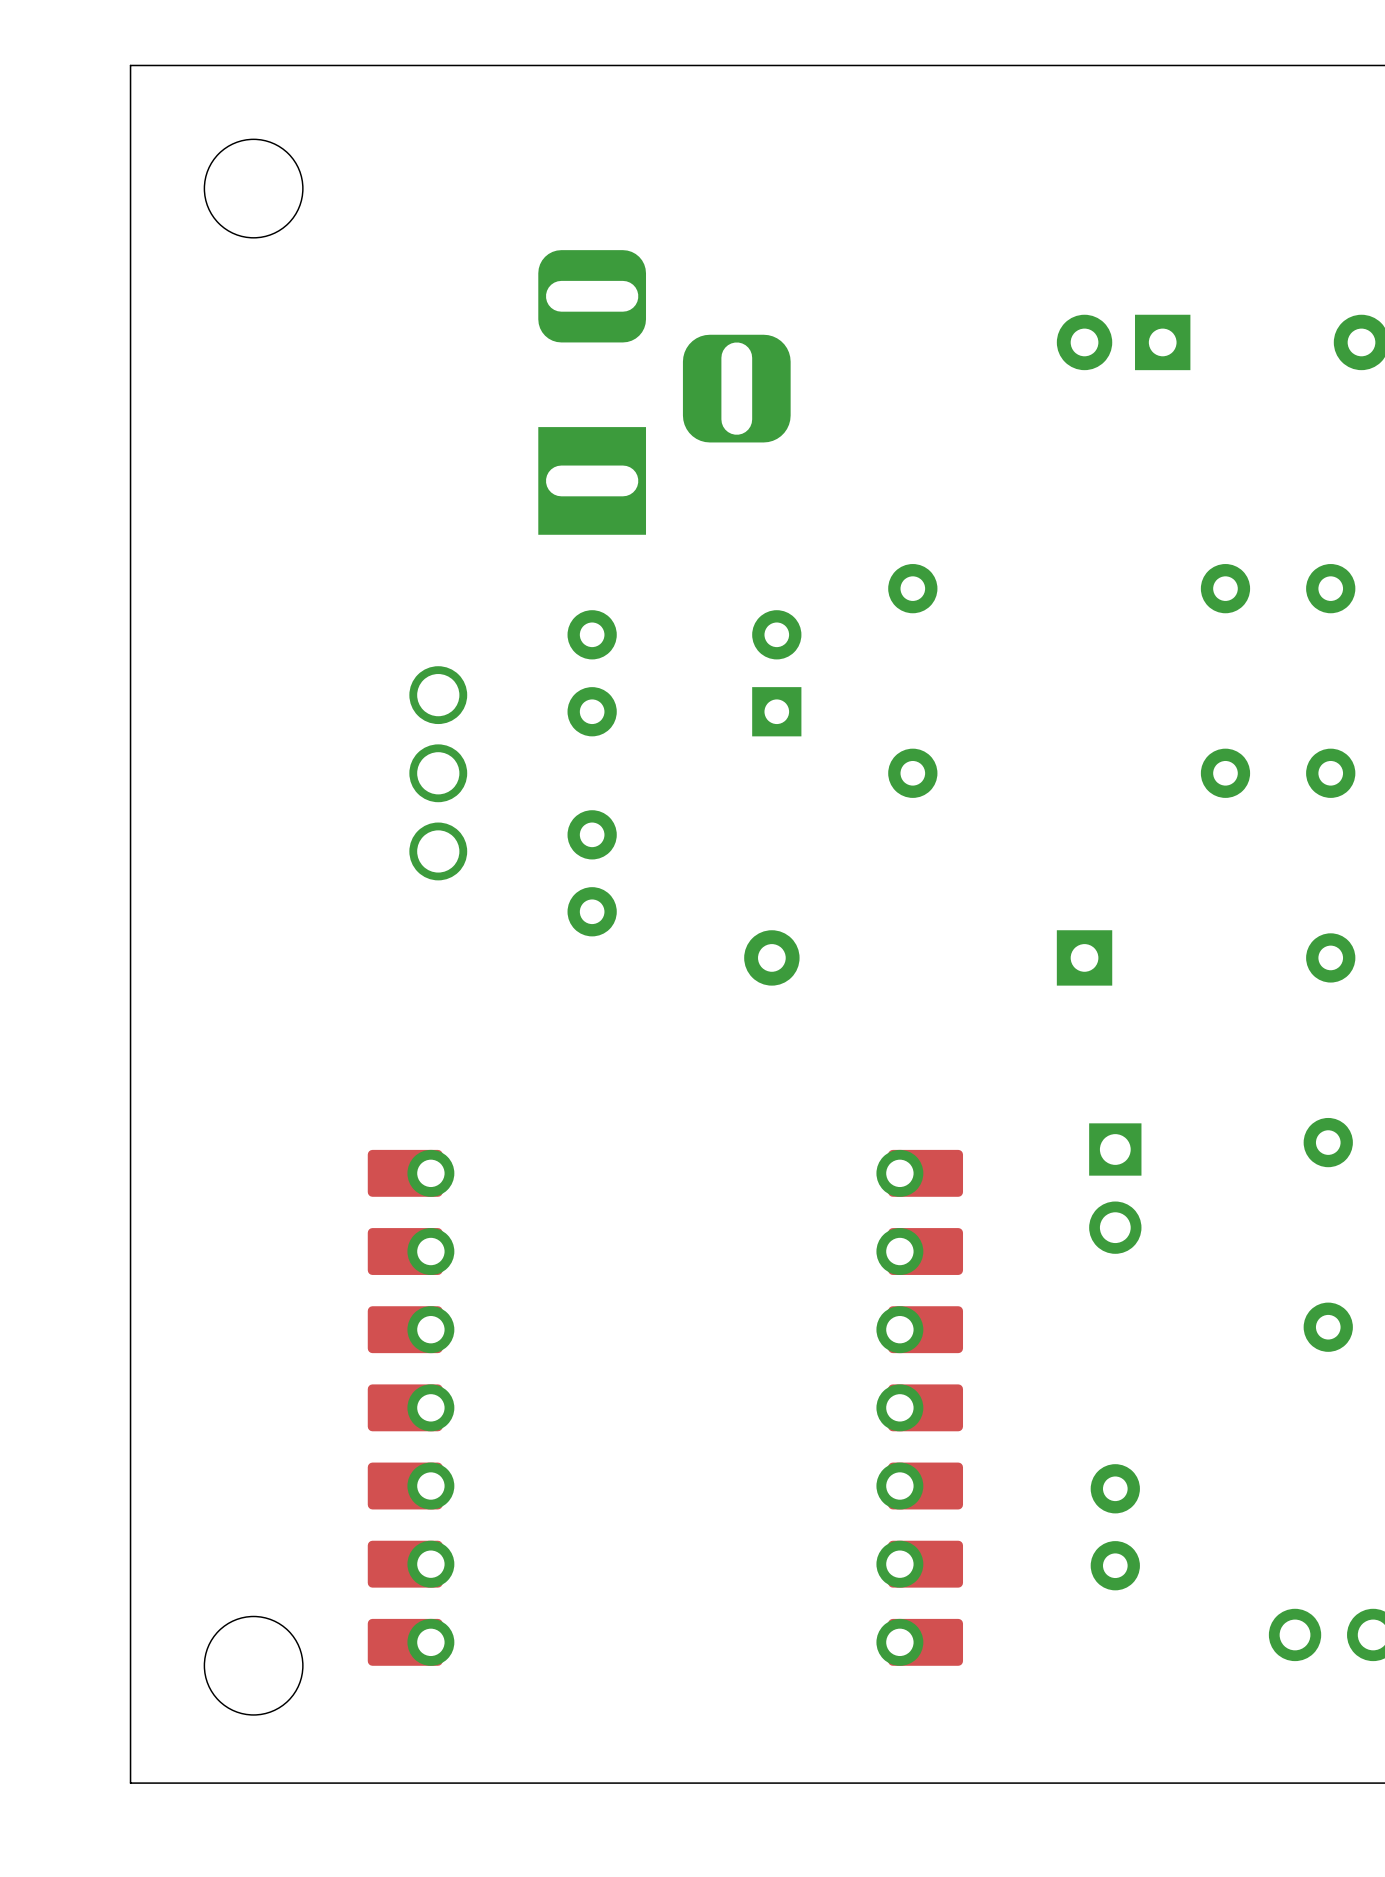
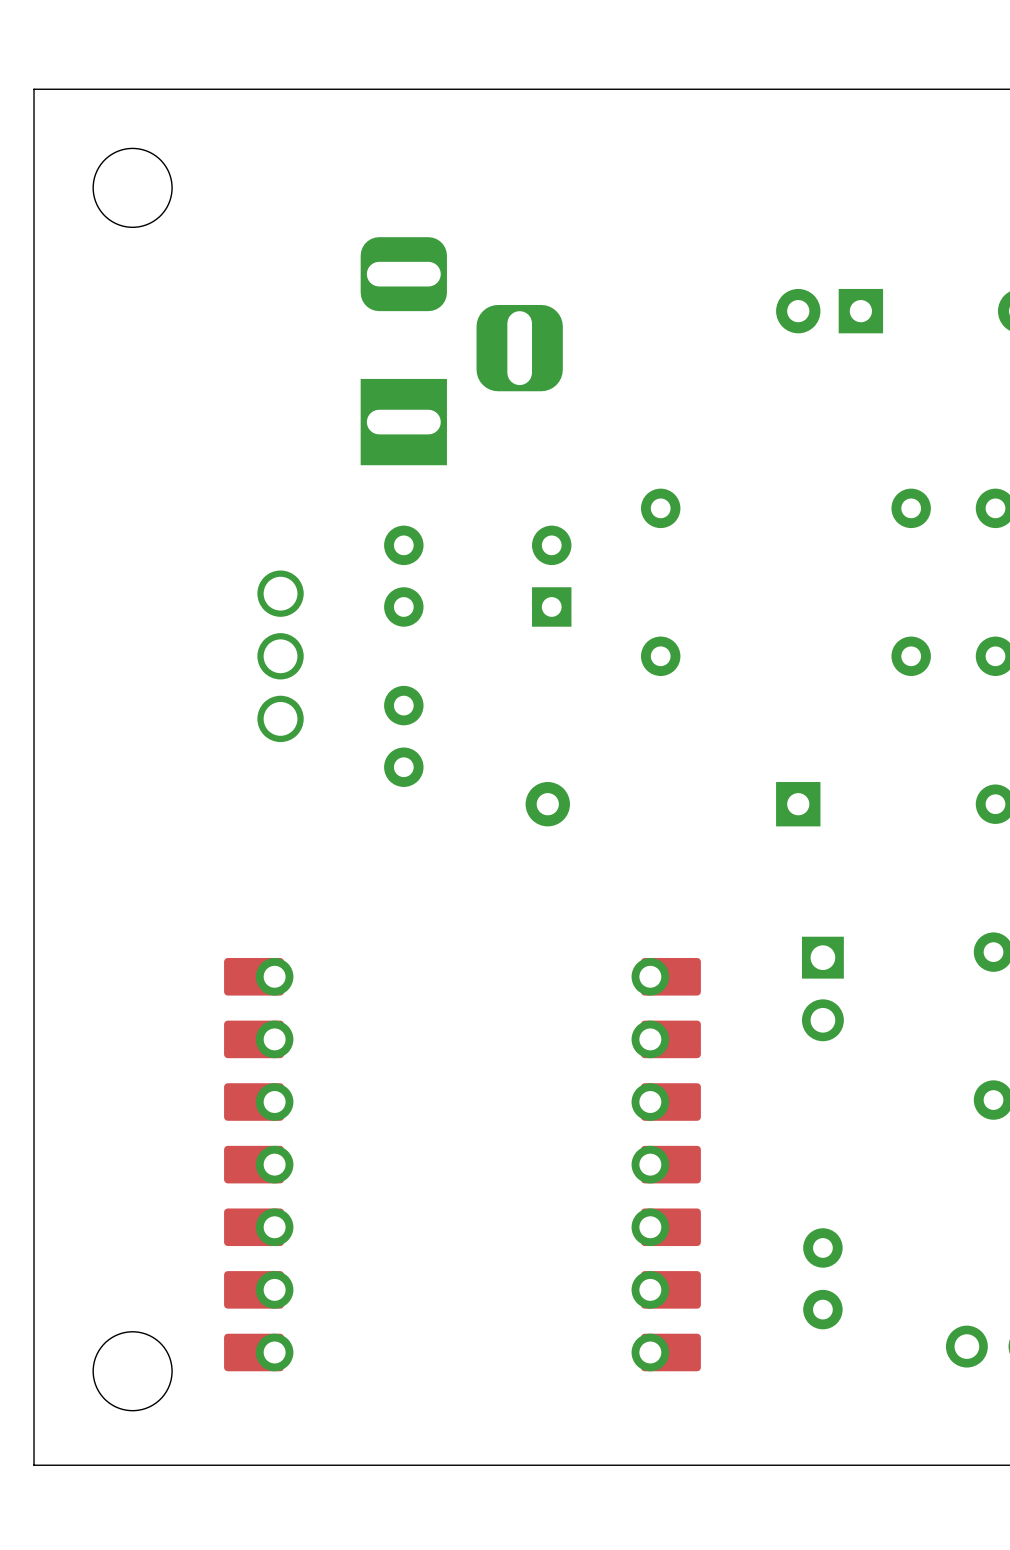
part position: (1115, 1527) -> (822, 1278)

